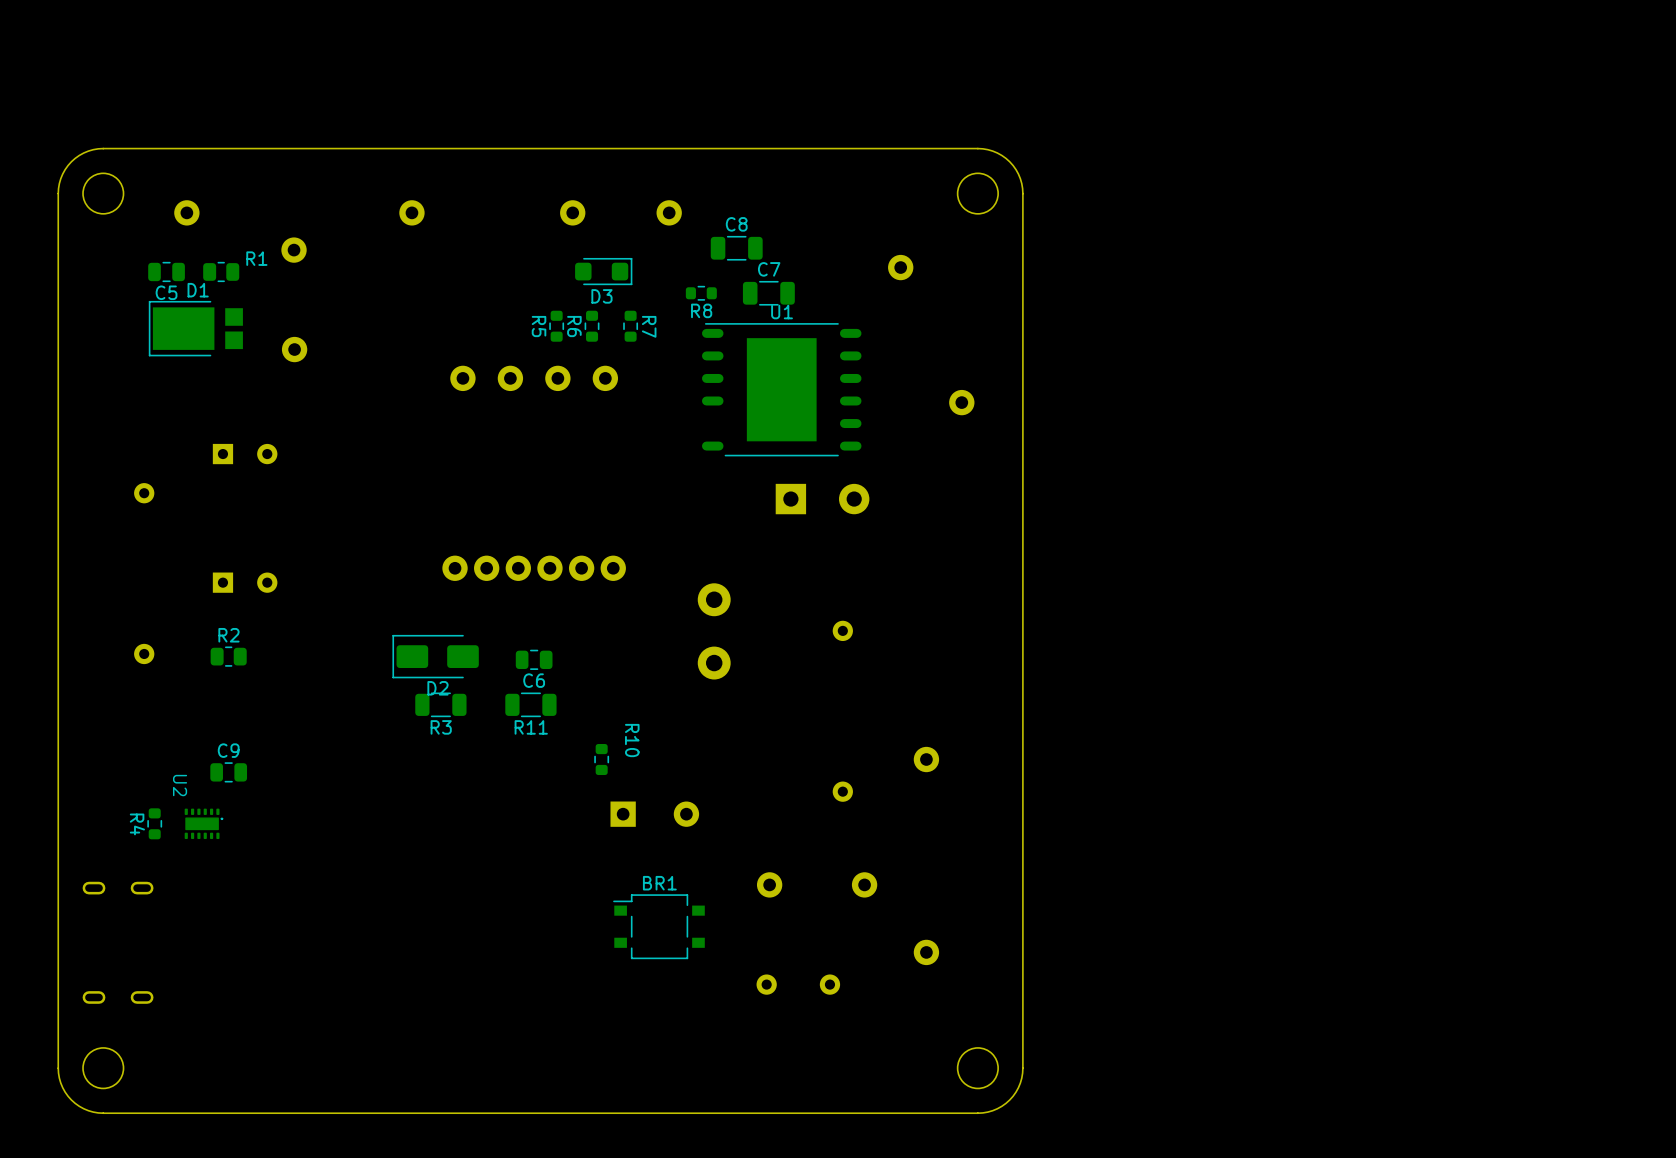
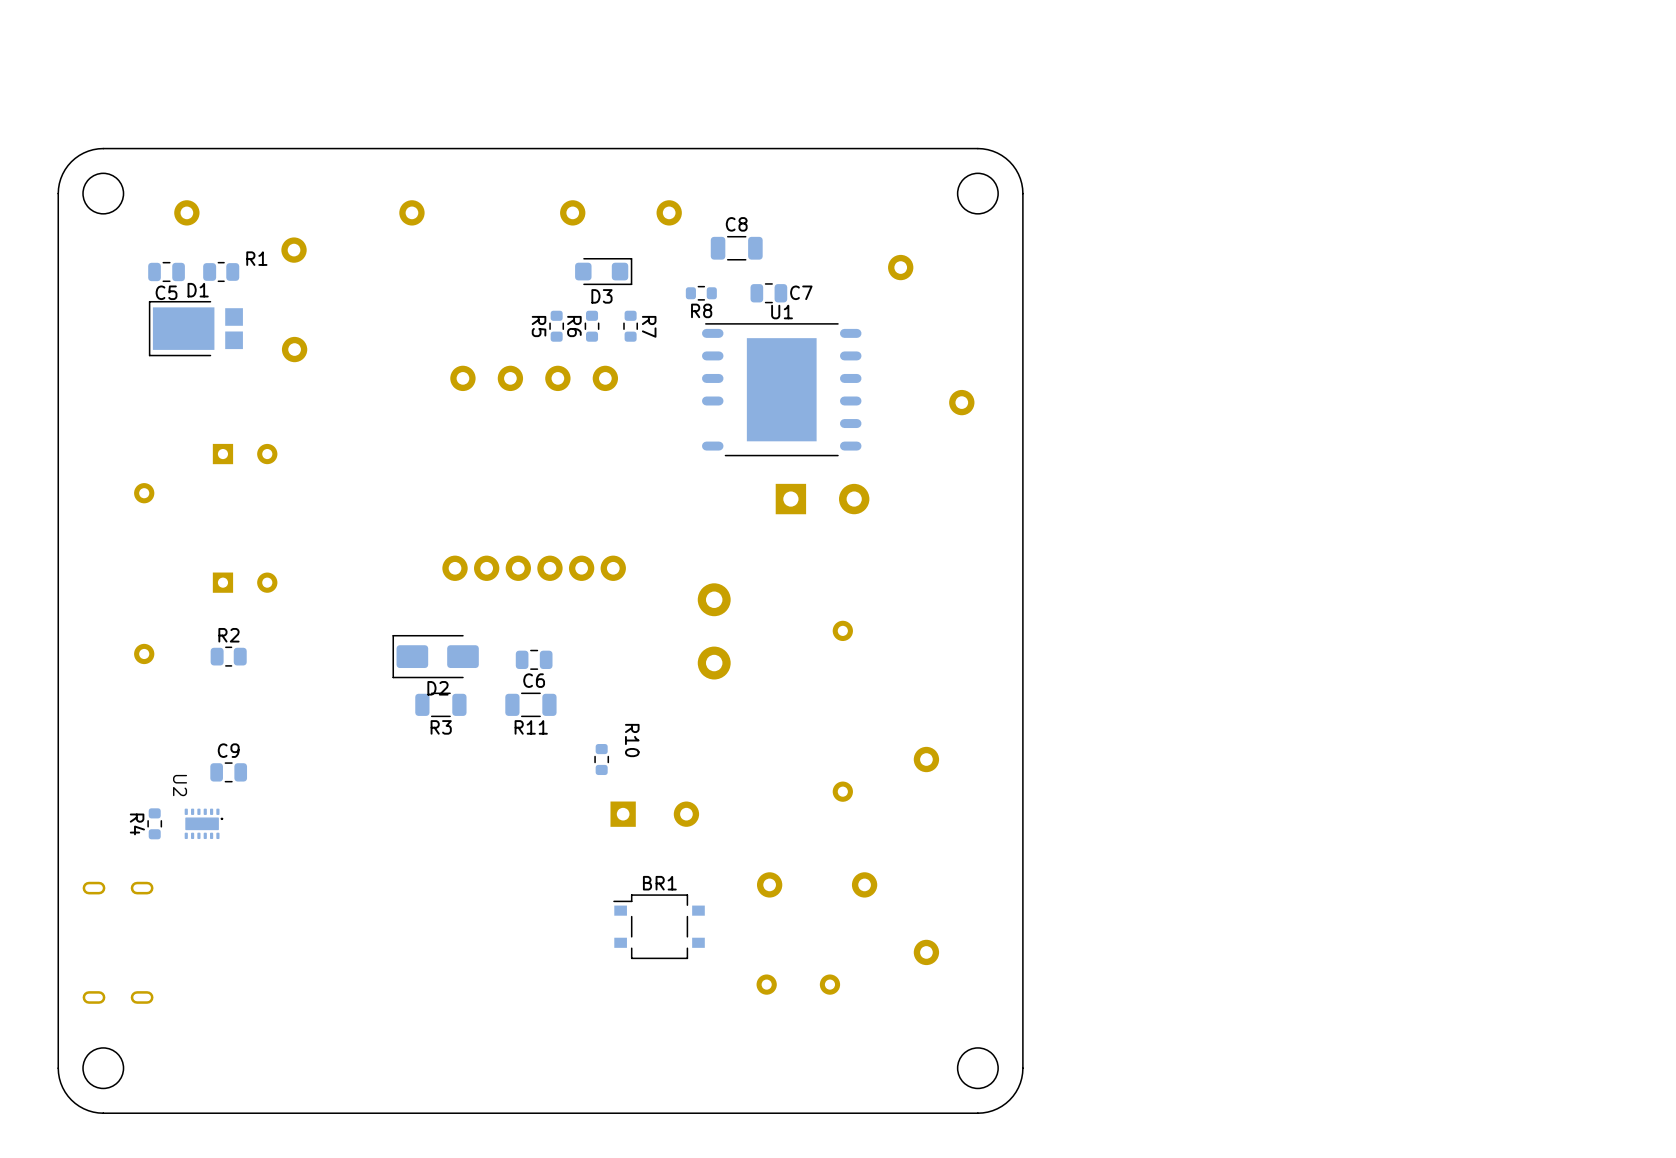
C7 name position: C7 (769, 269) -> C7 (801, 292)
C7 footprint: [742, 280, 795, 306] -> [750, 283, 788, 304]

